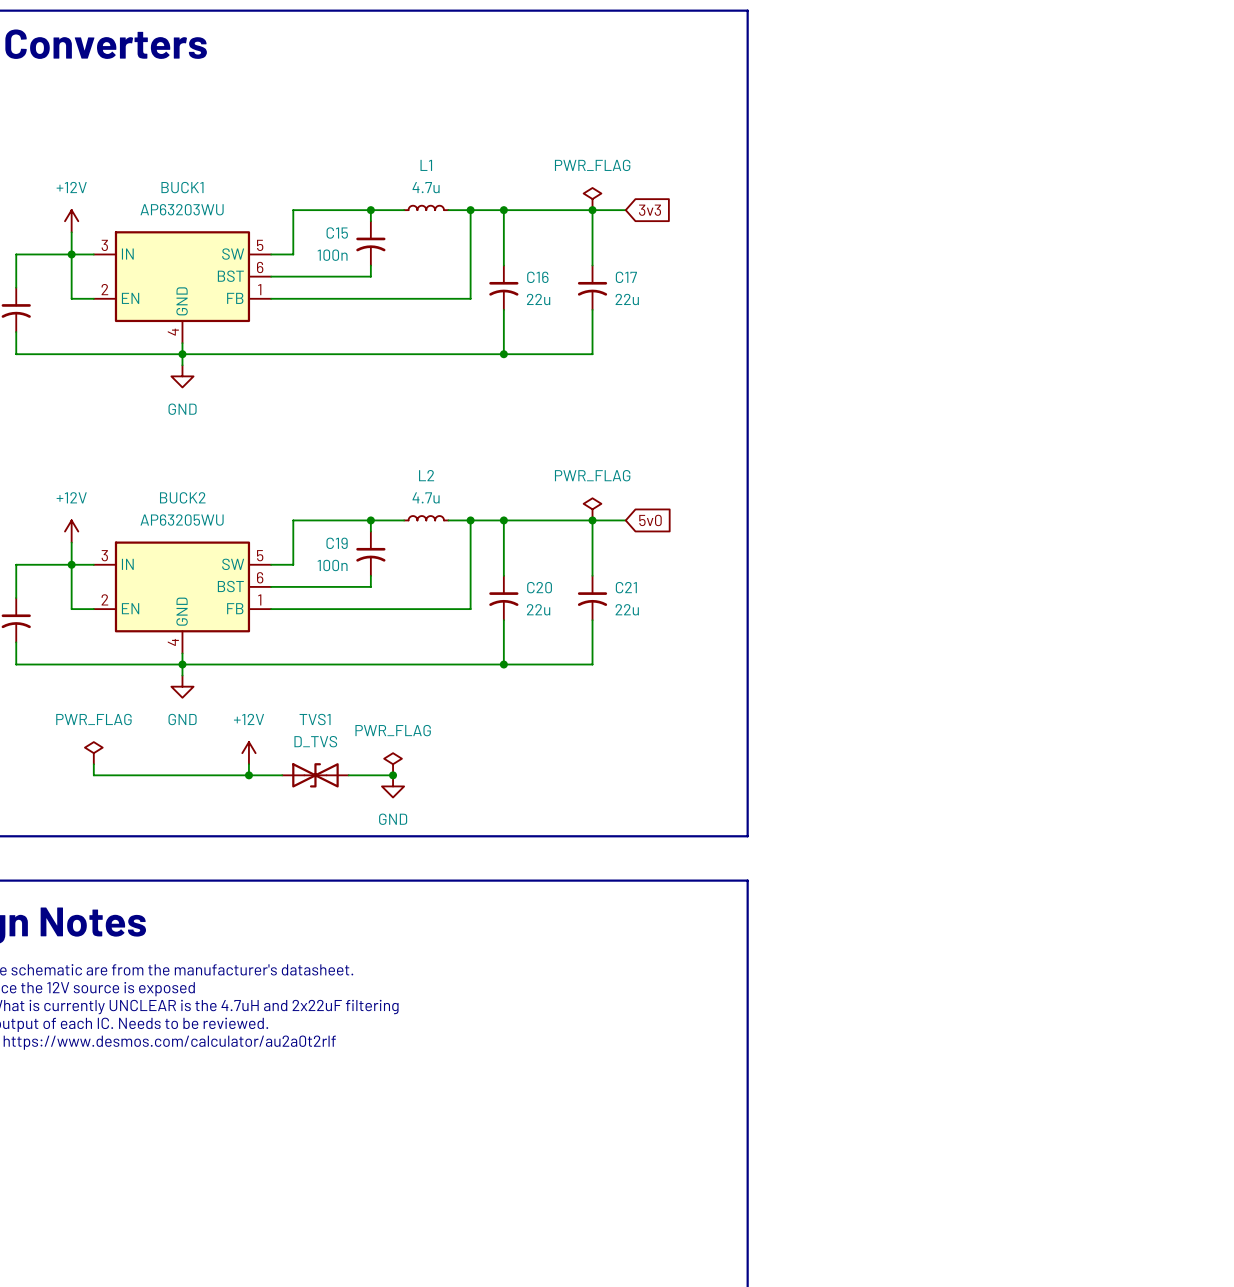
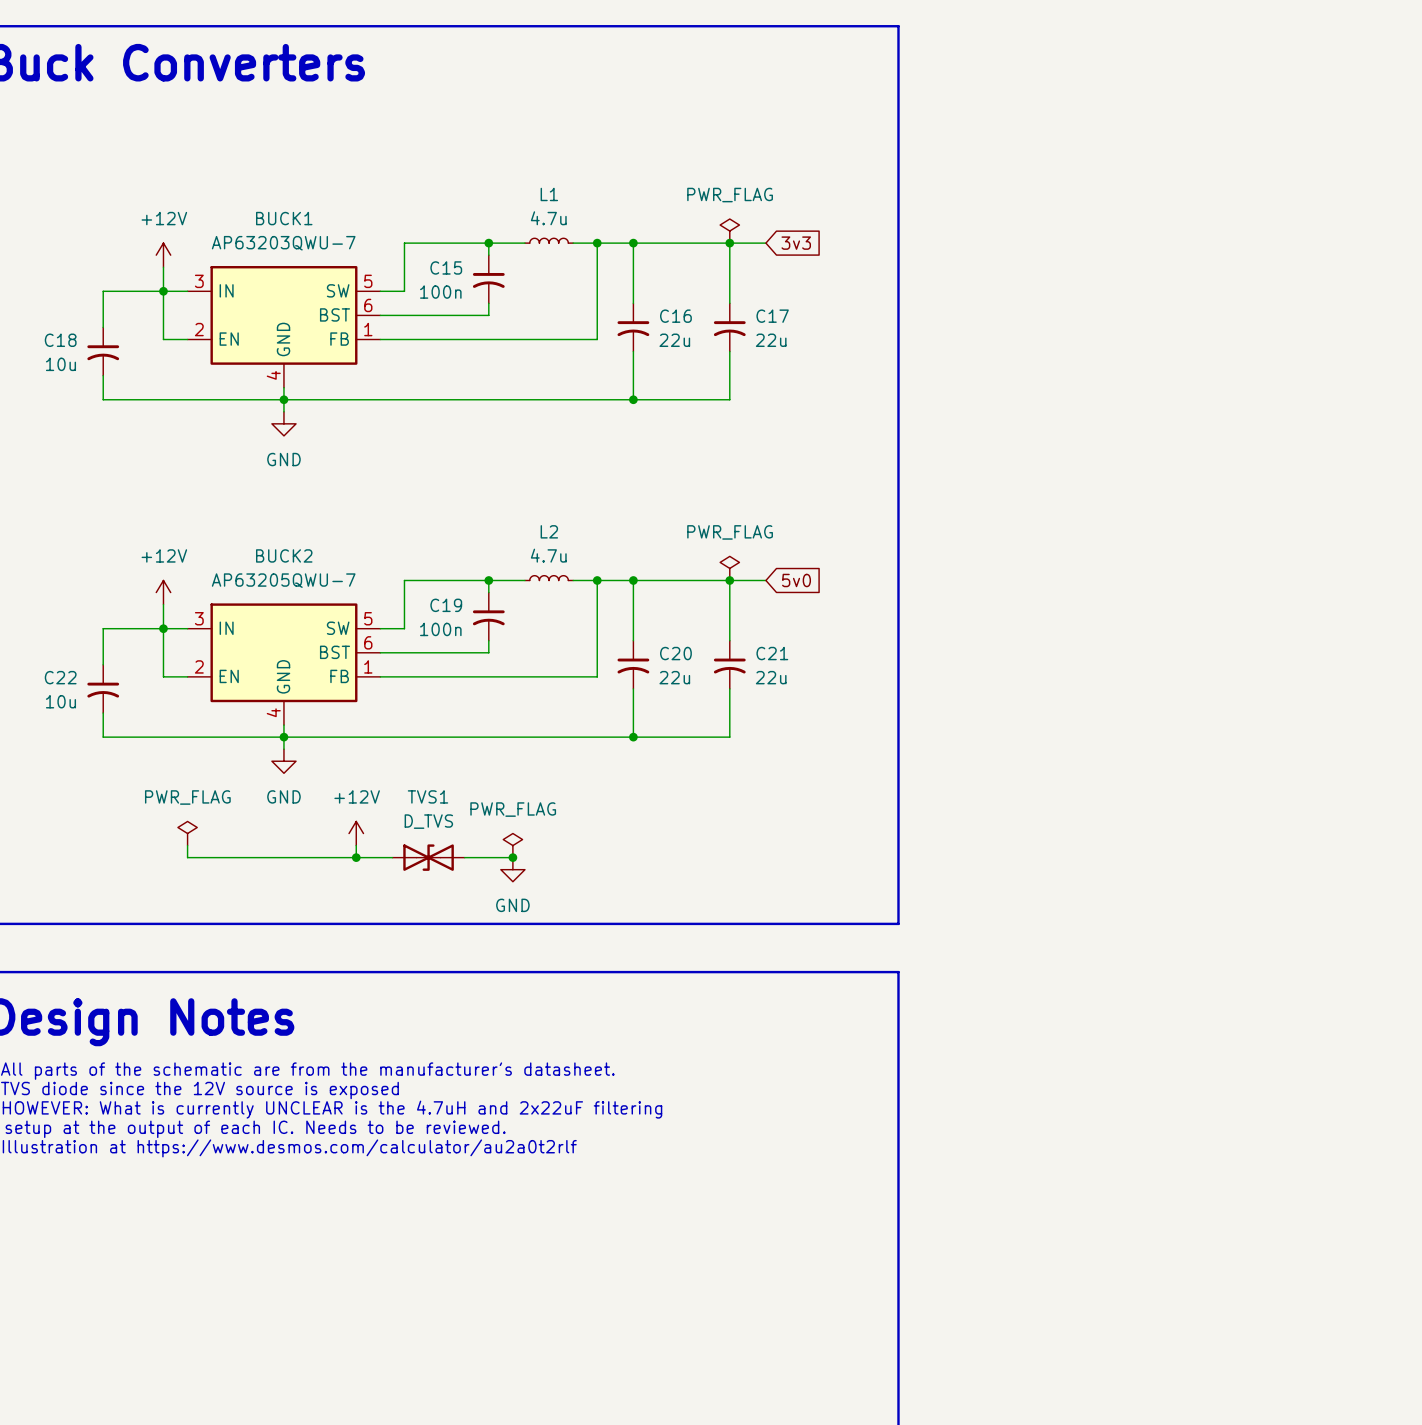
BUCK1 value: AP63203WU (182, 209) -> AP63203QWU-7 (283, 243)
BUCK2 value: AP63205WU (182, 520) -> AP63205QWU-7 (283, 580)

